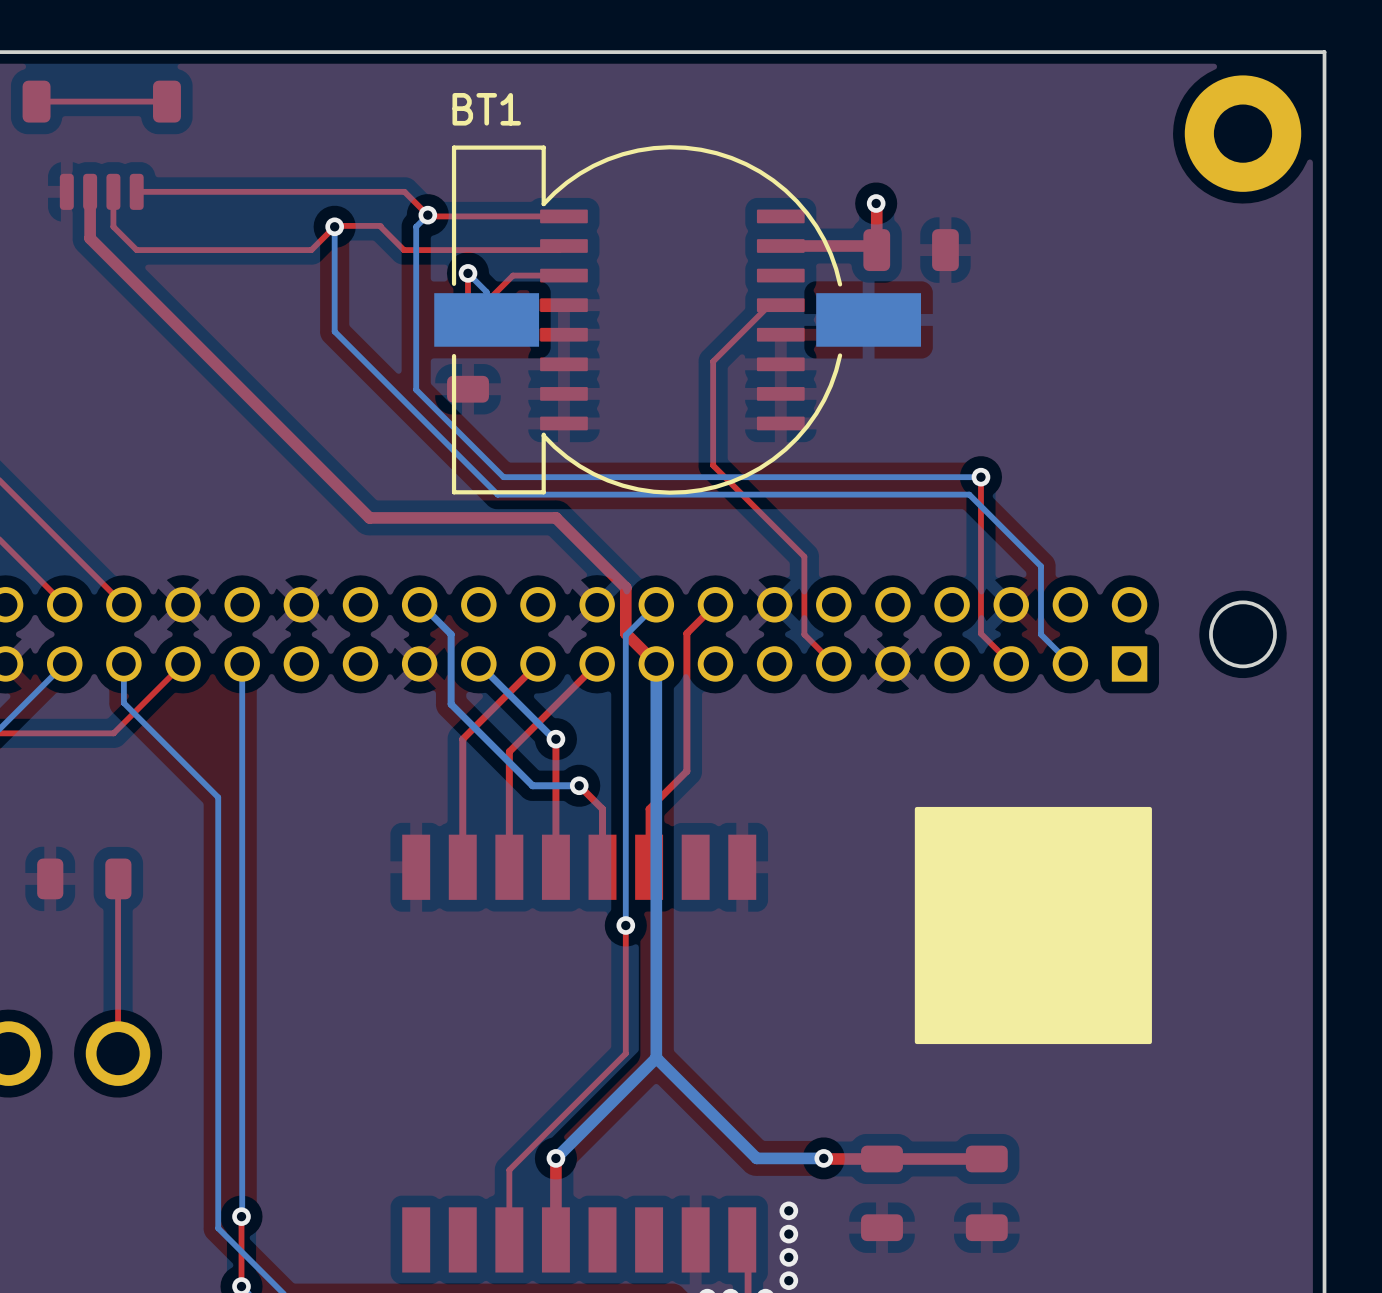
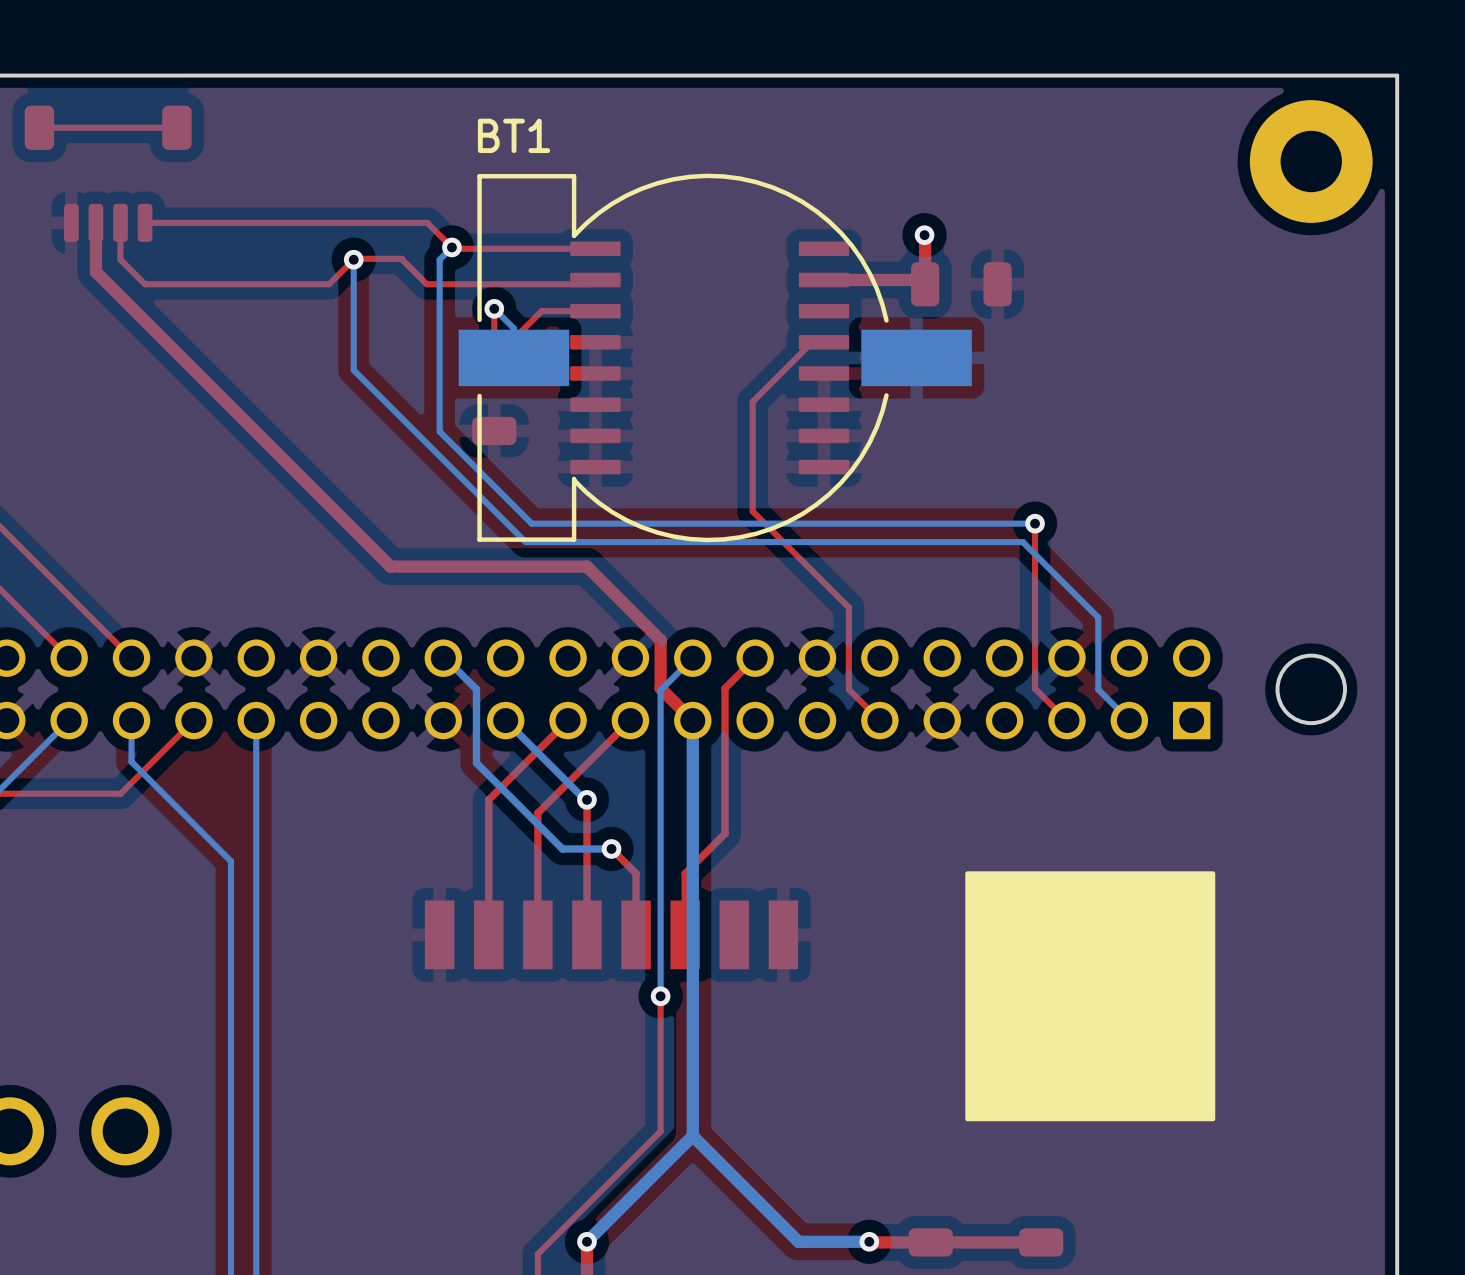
part: (84, 878) -> none
top track: (118, 879) (118, 1053) -> none

